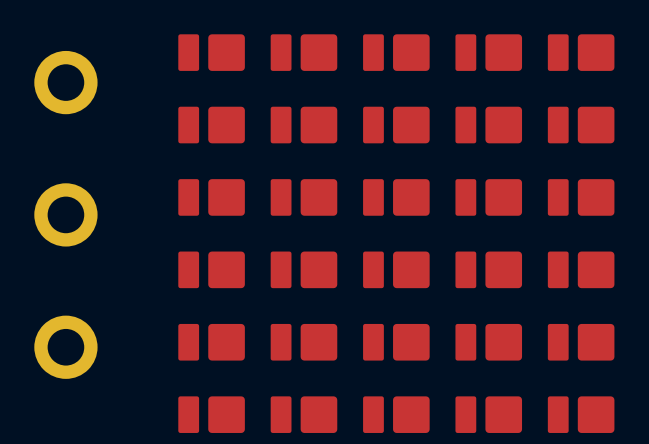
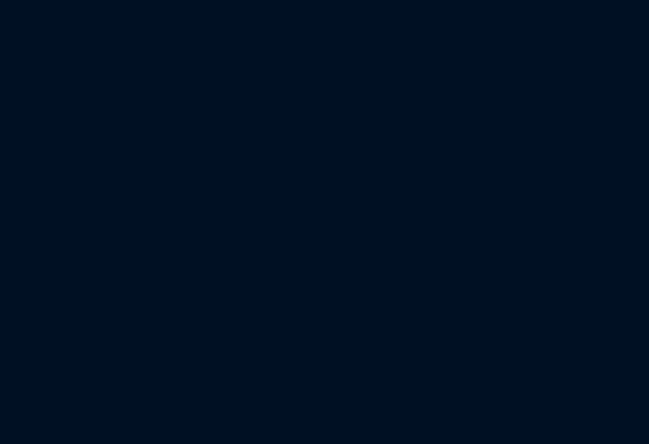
part: (211, 52) -> none
part: (303, 52) -> none
part: (396, 52) -> none
part: (488, 52) -> none
part: (581, 52) -> none
part: (65, 82) -> none
part: (211, 125) -> none
part: (303, 125) -> none
part: (396, 125) -> none
part: (488, 125) -> none
part: (581, 125) -> none
part: (211, 197) -> none
part: (303, 197) -> none
part: (396, 197) -> none
part: (488, 197) -> none
part: (581, 197) -> none
part: (65, 214) -> none
part: (211, 269) -> none
part: (303, 269) -> none
part: (396, 269) -> none
part: (488, 269) -> none
part: (581, 269) -> none
part: (211, 342) -> none
part: (303, 342) -> none
part: (396, 342) -> none
part: (488, 342) -> none
part: (581, 342) -> none
part: (65, 347) -> none
part: (211, 414) -> none
part: (303, 414) -> none
part: (396, 414) -> none
part: (488, 414) -> none
part: (581, 414) -> none

